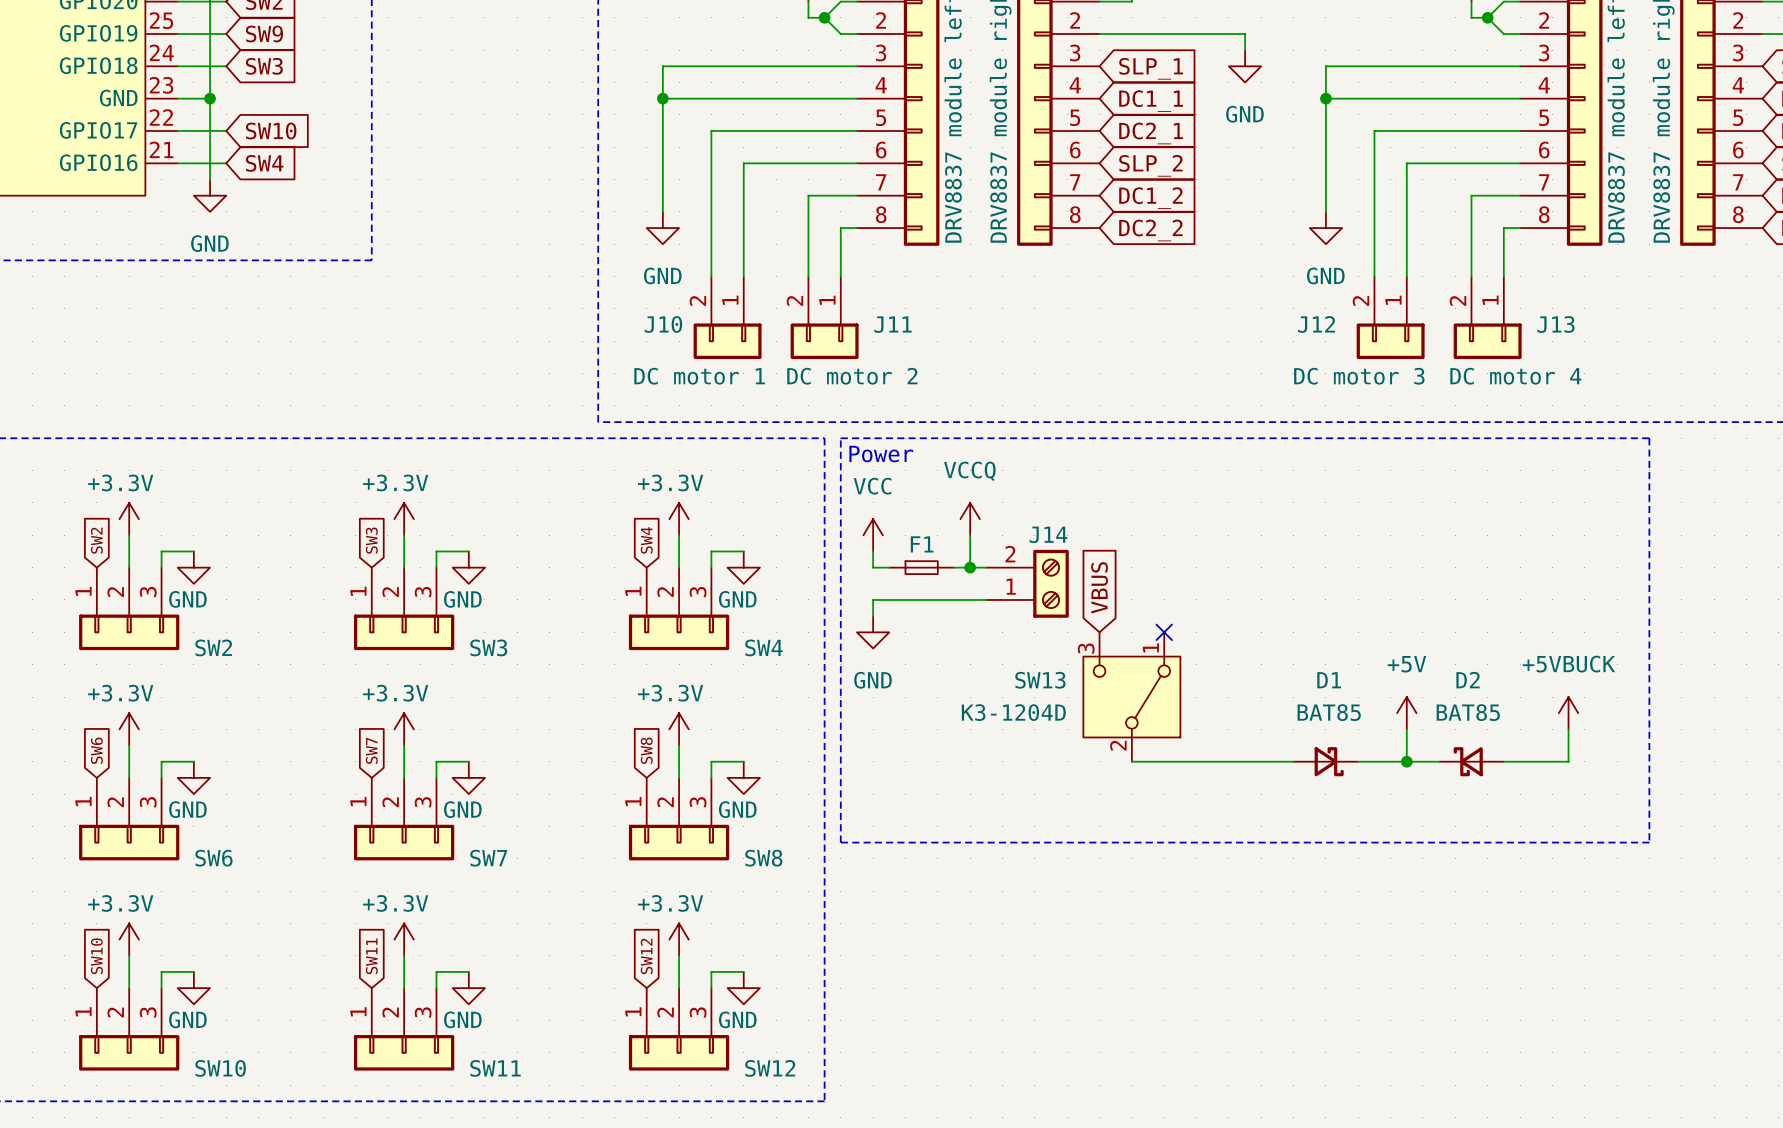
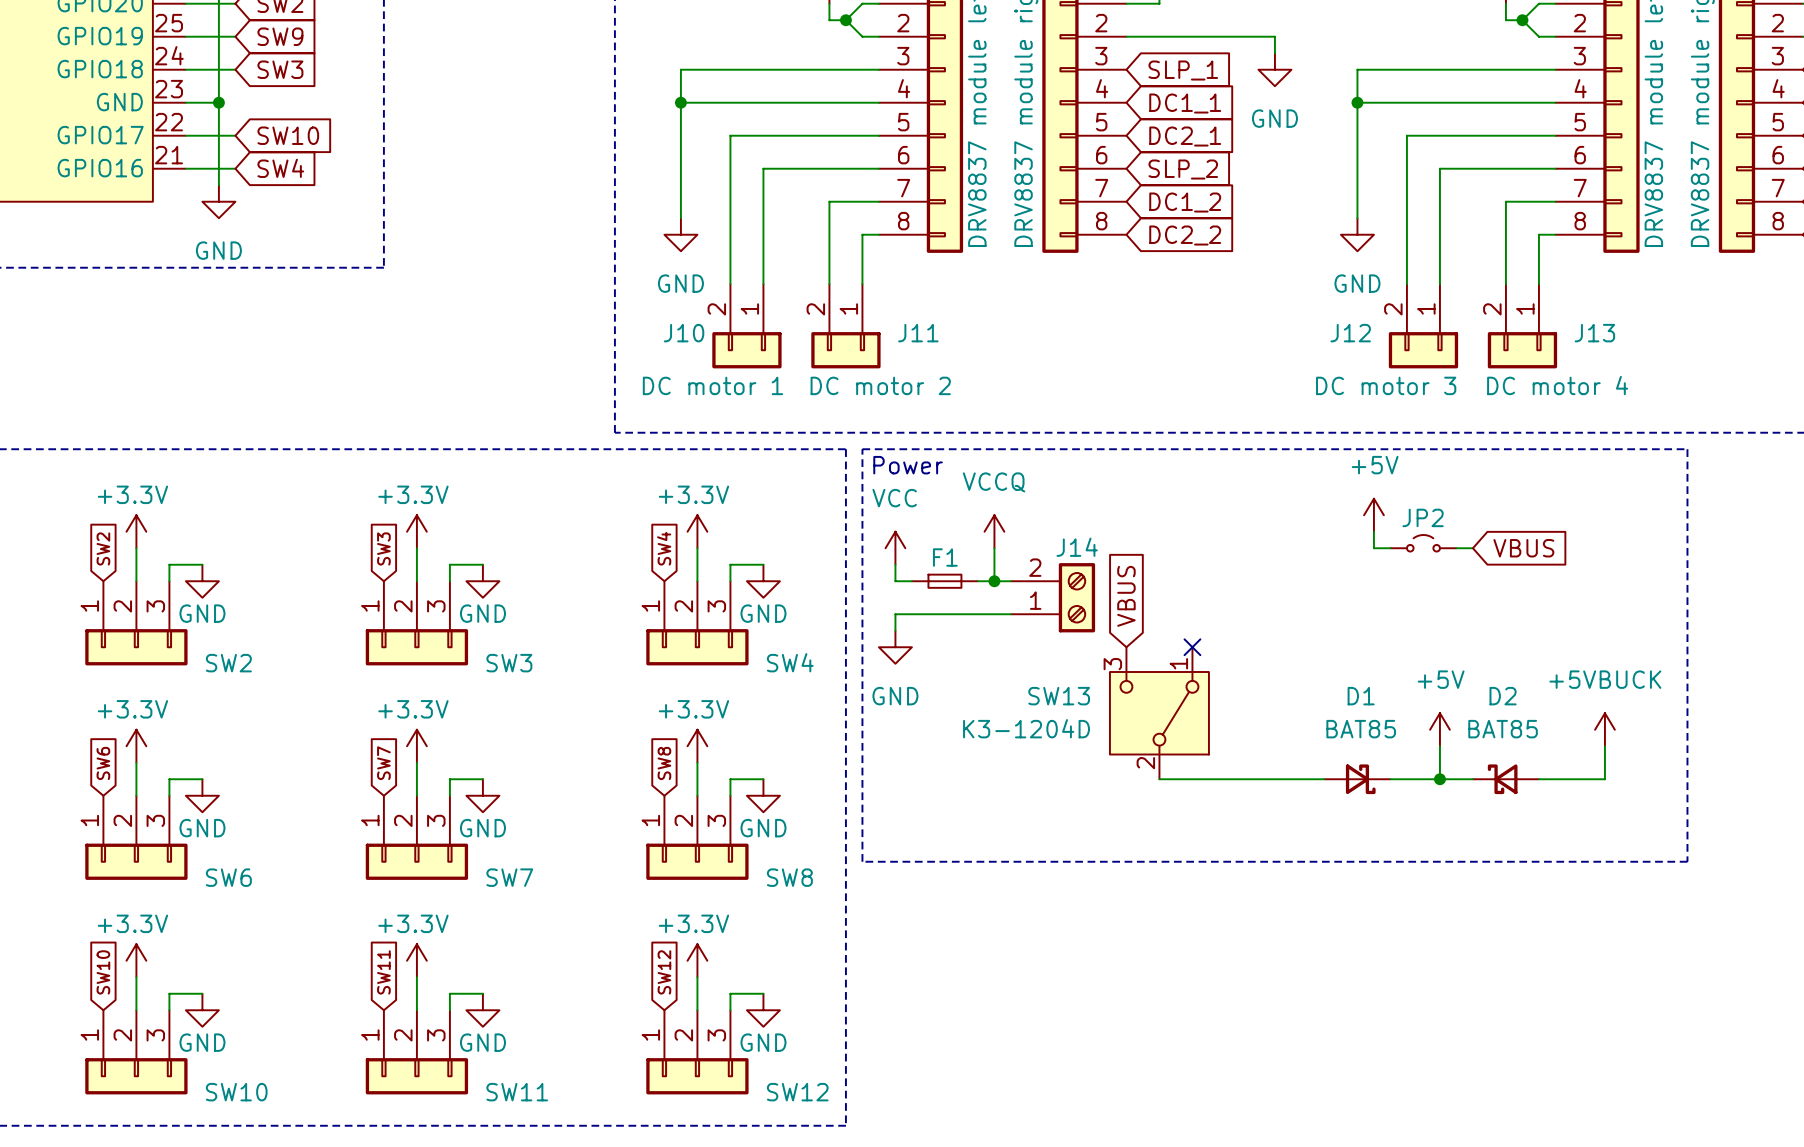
power symbol: none -> +5V (1373, 515)
wire: none -> (1373, 531) (1373, 548) (1390, 548)
JP2: none -> (1423, 543)
wire: none -> (1456, 548) (1472, 548)
global label: none -> VBUS (1523, 548)

